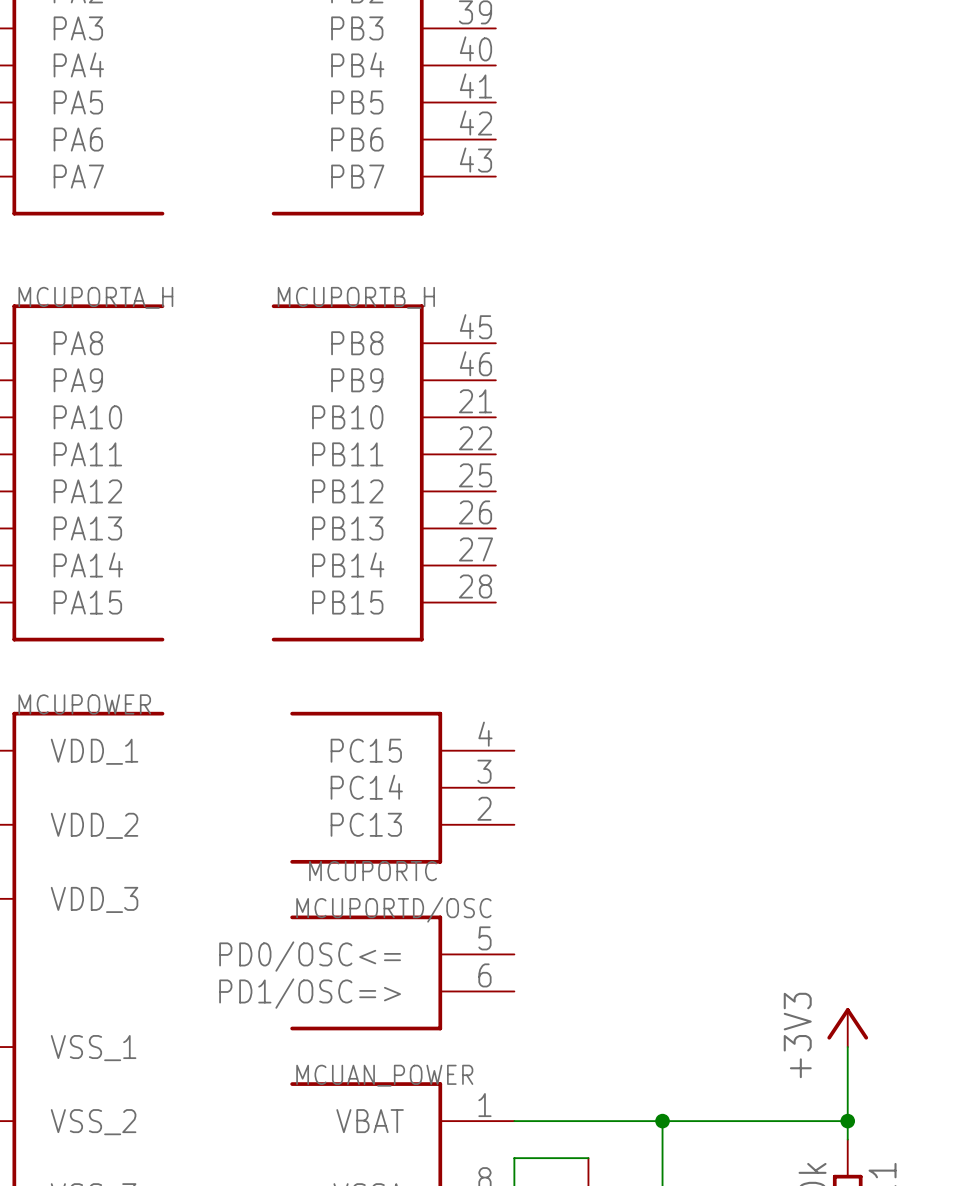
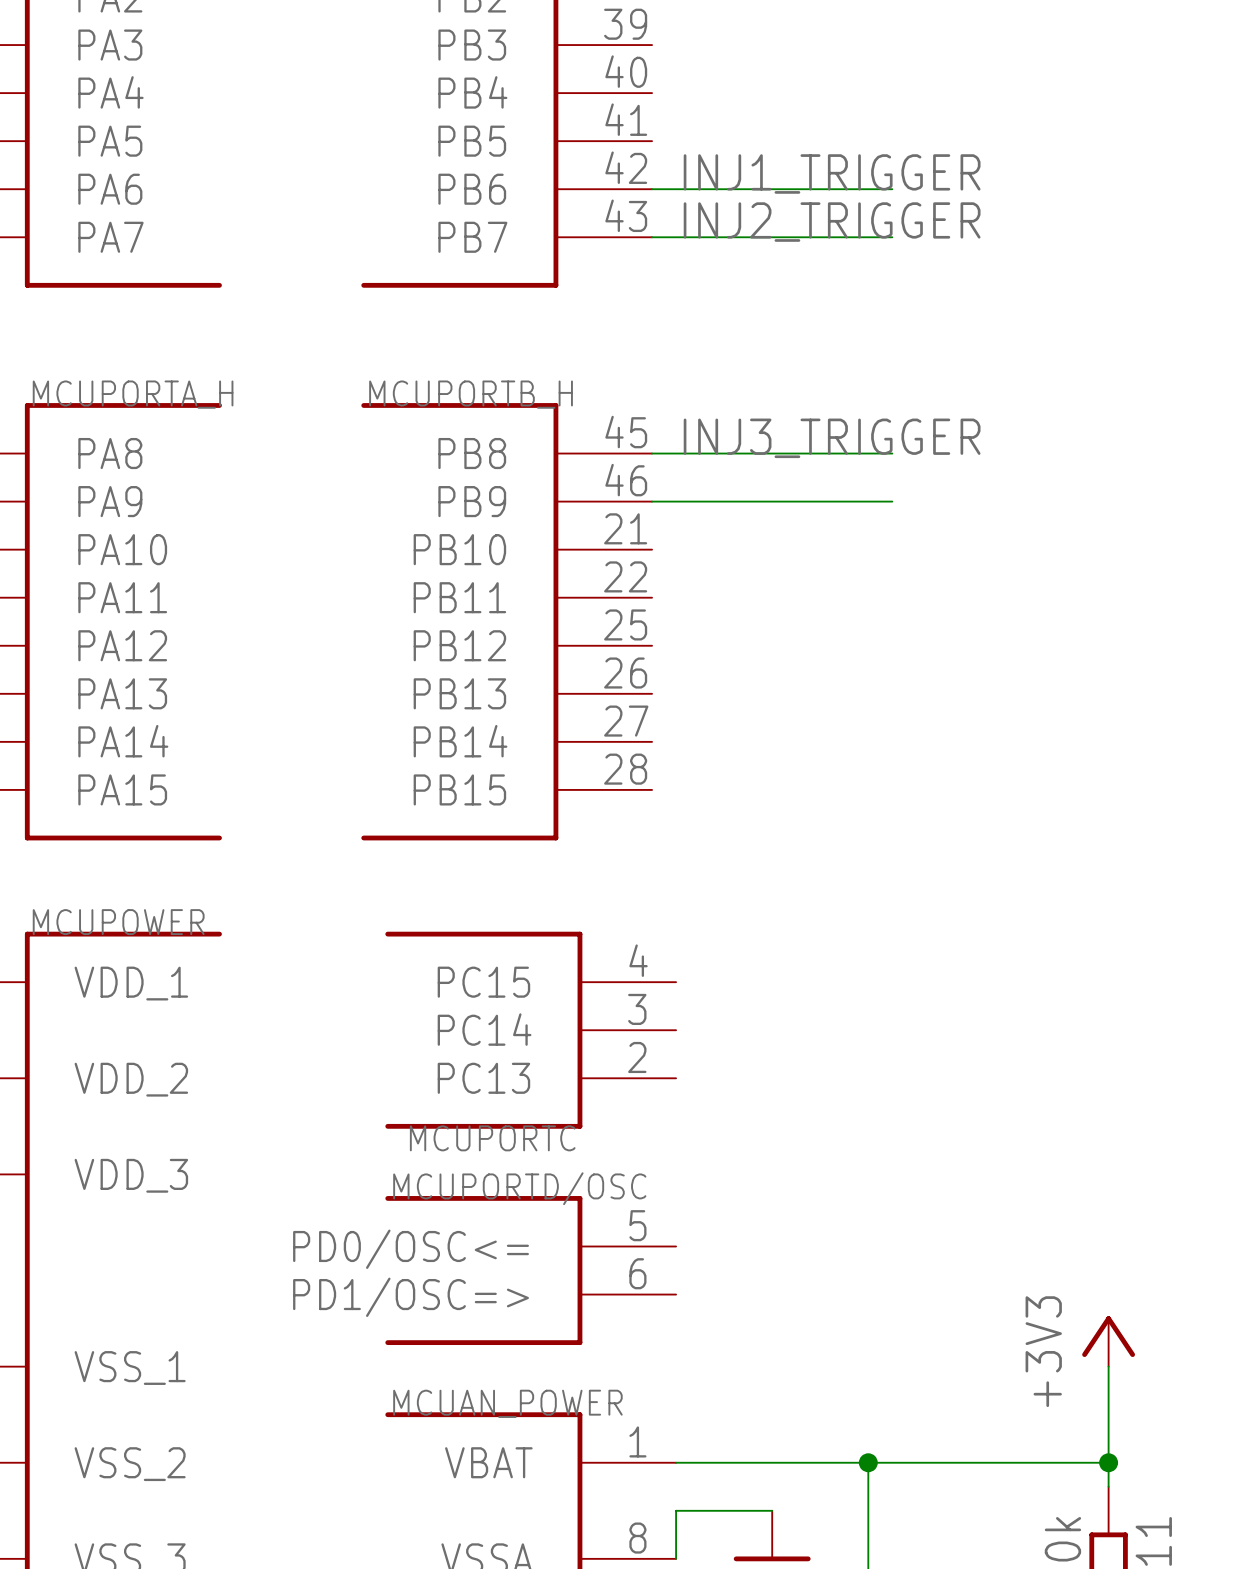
label: none -> INJ1_TRIGGER (832, 173)
wire: none -> (652, 189) (892, 189)
label: none -> INJ2_TRIGGER (832, 222)
wire: none -> (652, 237) (892, 237)
label: none -> INJ3_TRIGGER (832, 438)
wire: none -> (652, 453) (892, 453)
wire: none -> (652, 501) (892, 501)

